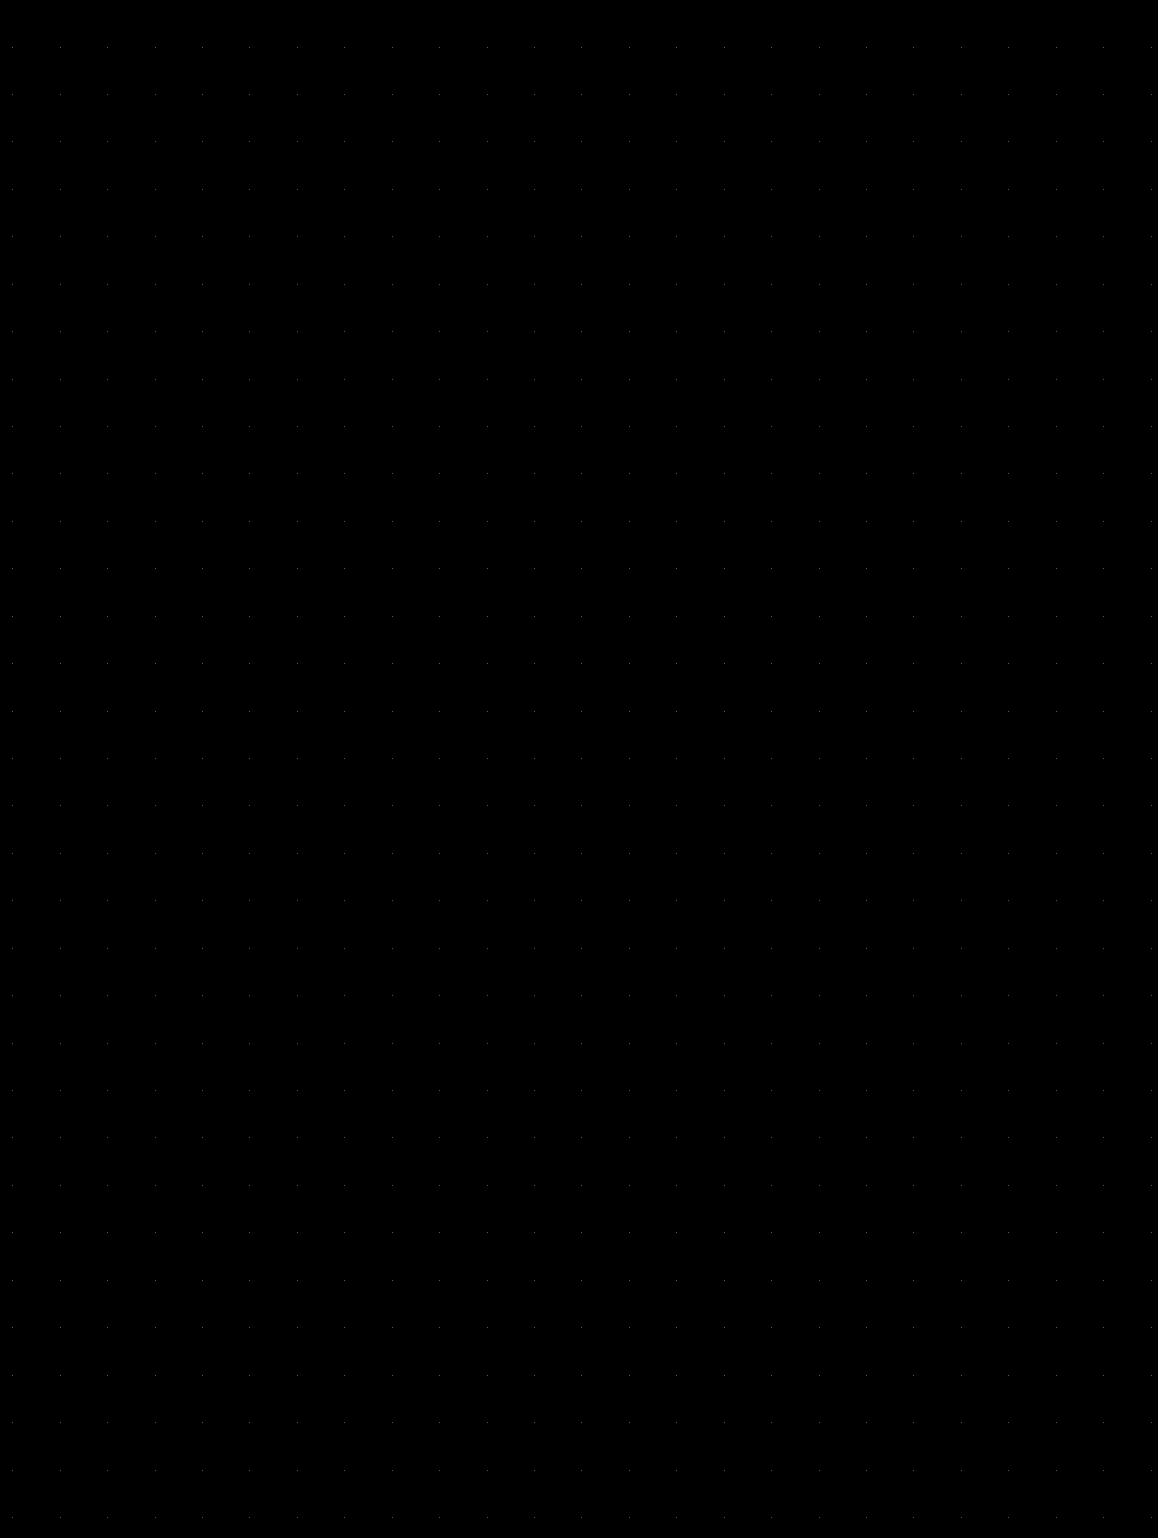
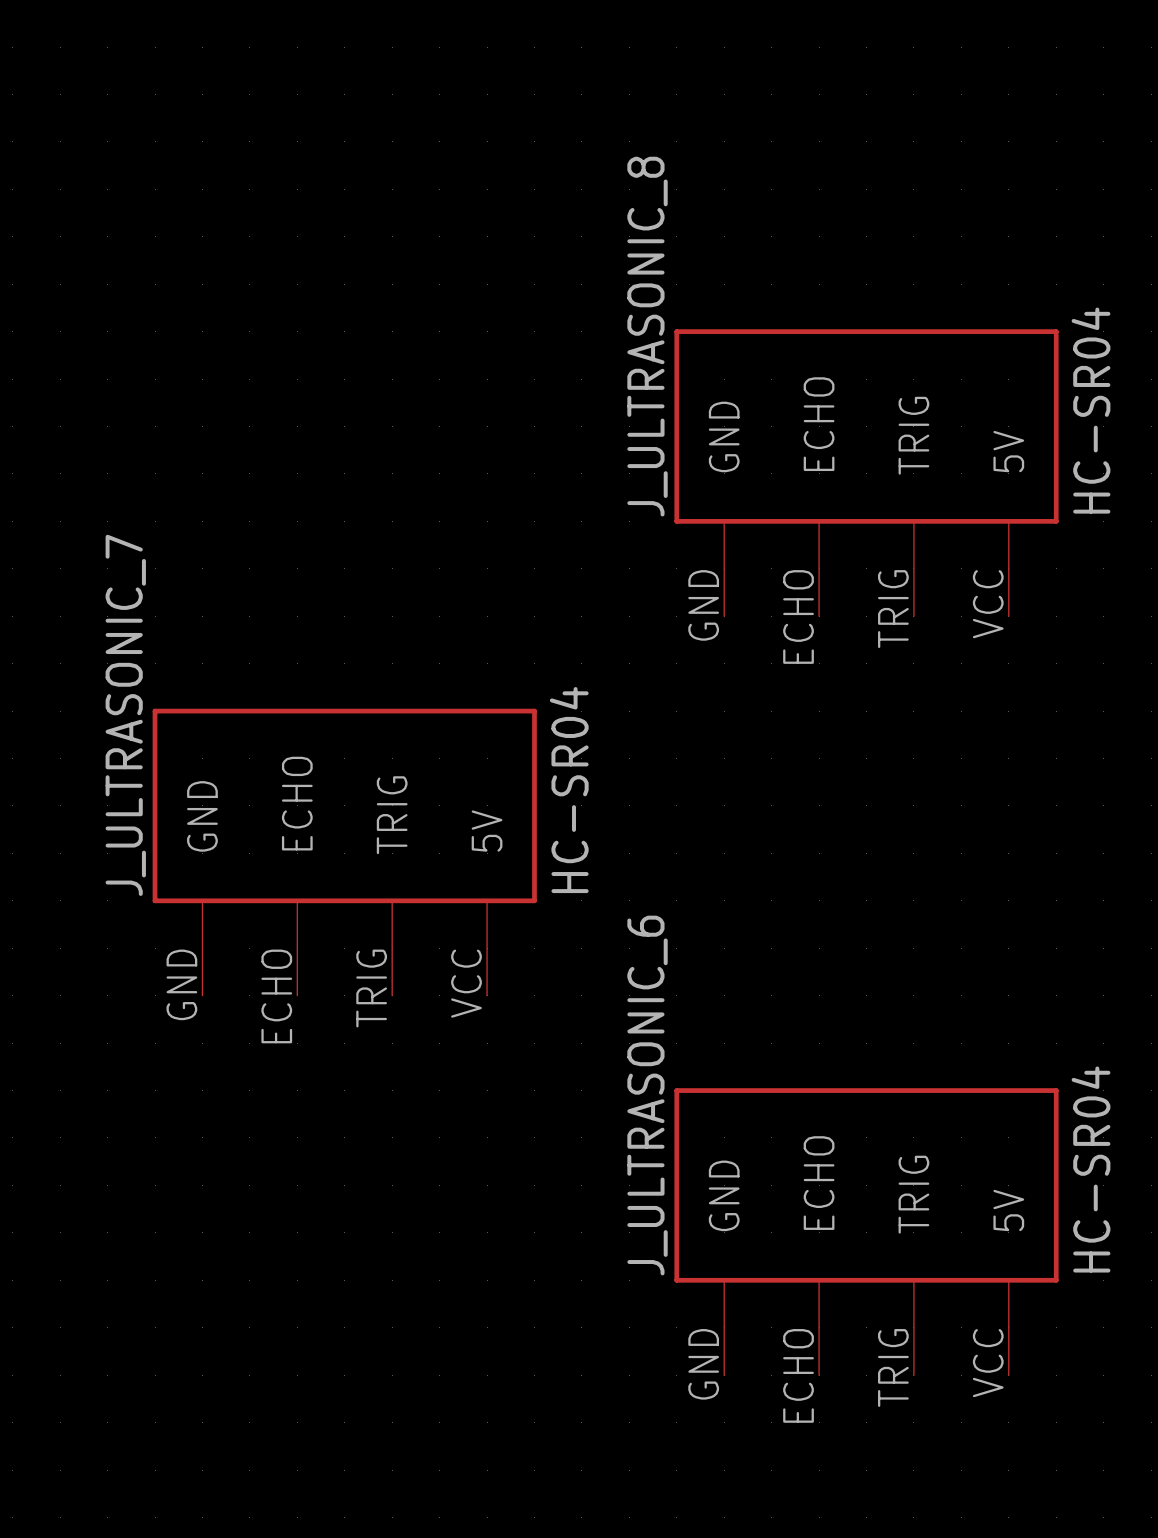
J_ULTRASONIC_8: none -> HC-SR04 (866, 472)
J_ULTRASONIC_7: none -> HC-SR04 (344, 852)
J_ULTRASONIC_6: none -> HC-SR04 (866, 1231)

